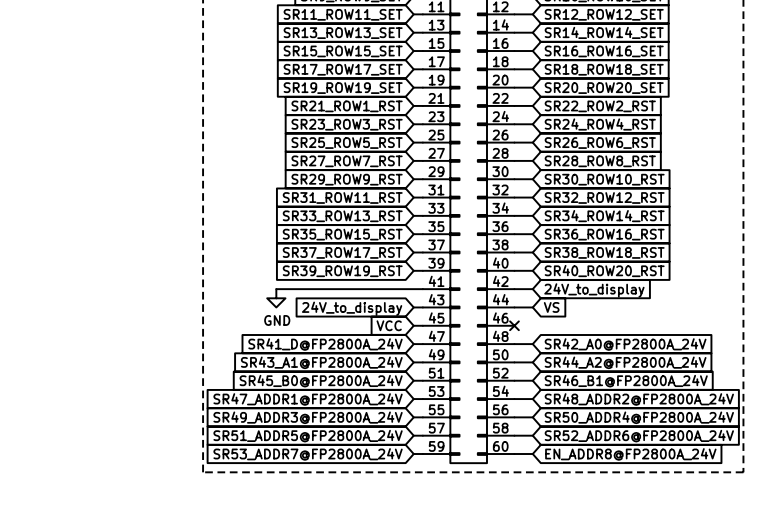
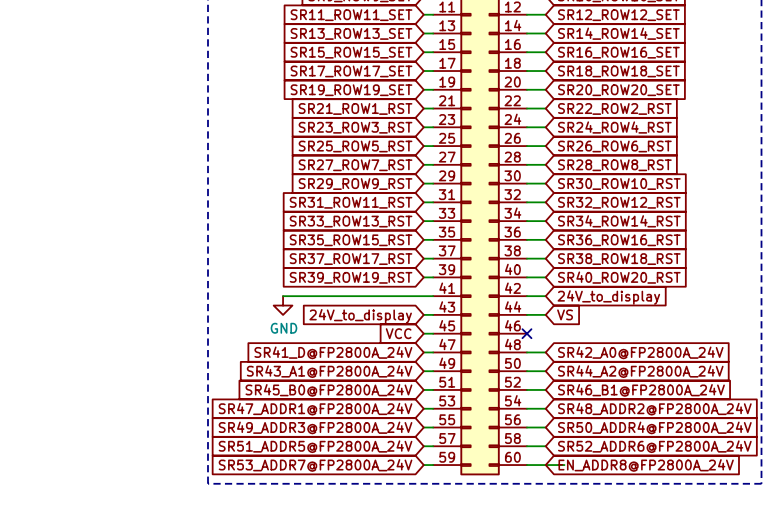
wire: none -> (545, 465) (564, 465)

